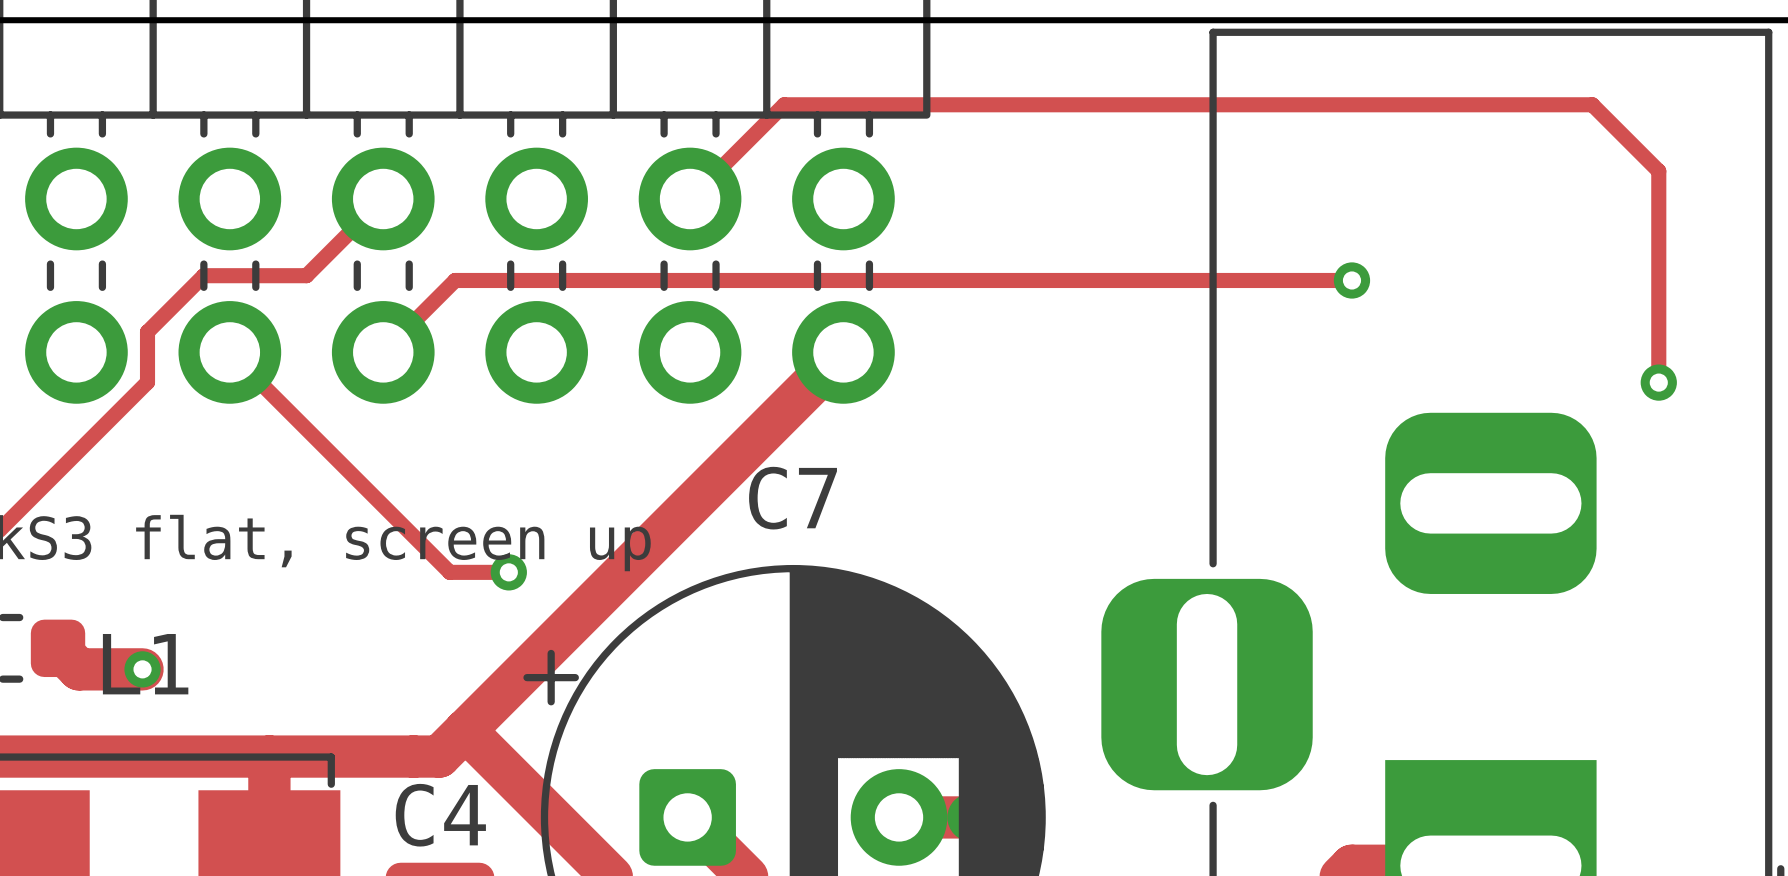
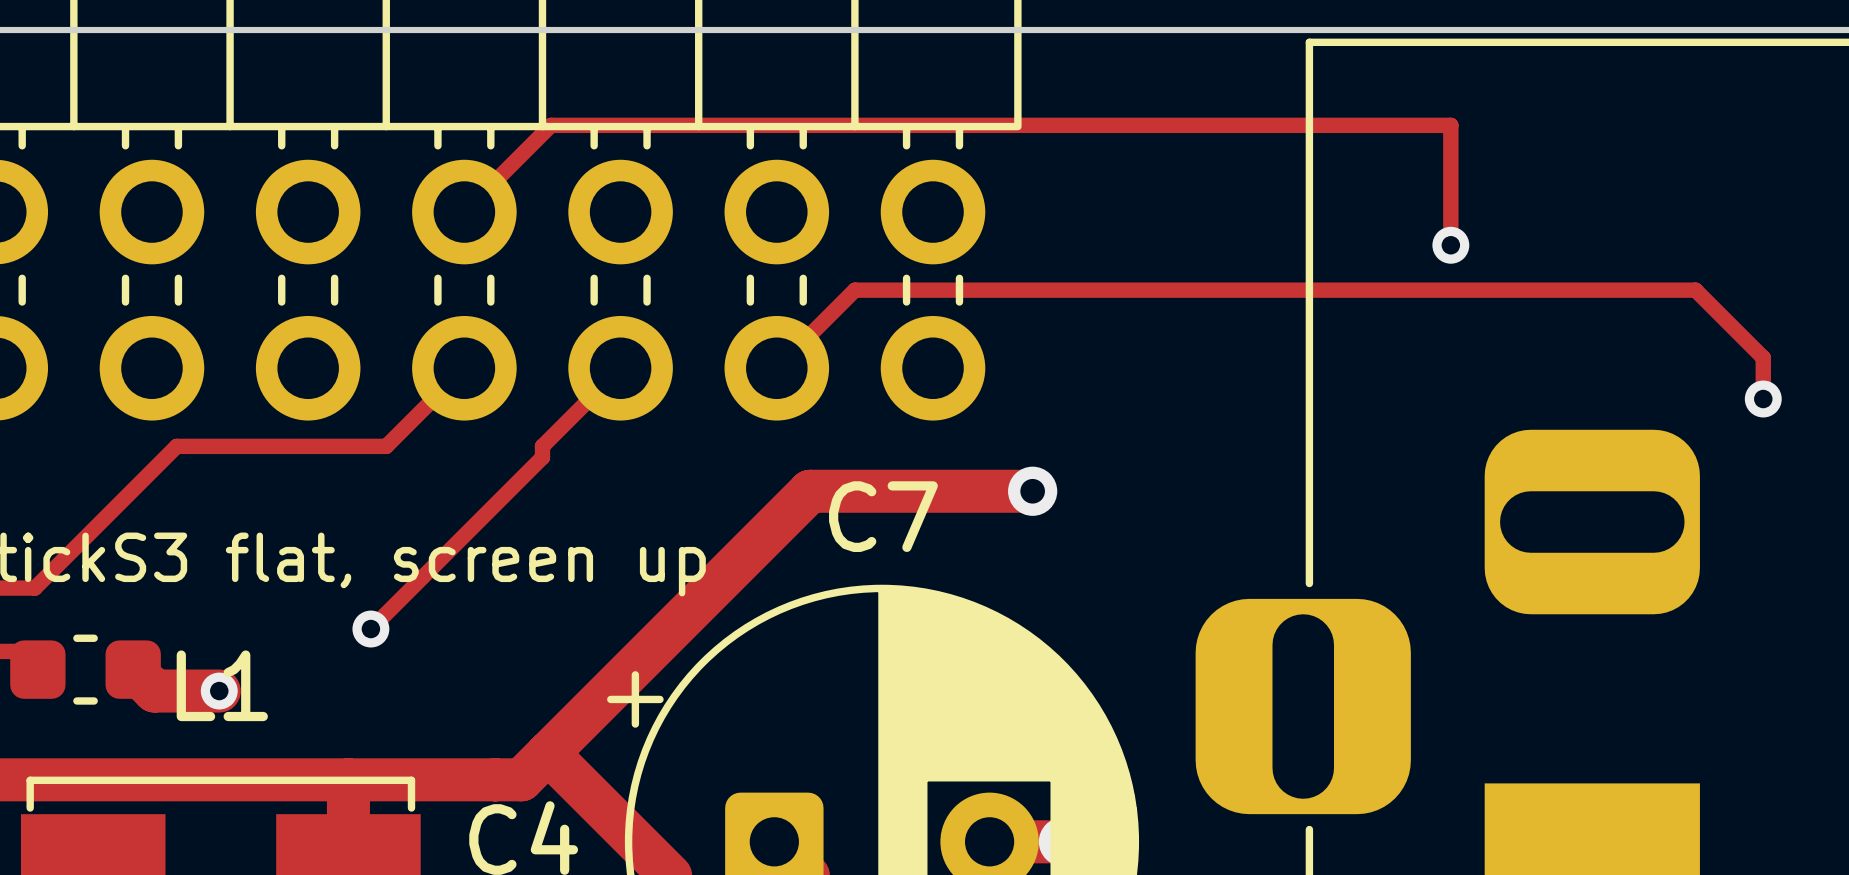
track: (383, 198) (306, 275) (203, 275) (147, 332) (147, 382) (100, 429) -> (464, 368) (386, 446) (176, 446)
track: none -> (464, 212) (551, 125) (1450, 125) (1450, 245)
track: (690, 198) (784, 104) (1592, 104) (1658, 171) (1658, 342) -> (776, 368) (854, 290) (1695, 290) (1763, 357)
track: (1351, 280) (455, 280) (383, 352) -> none
via position: (1351, 280) -> (1450, 245)
track: (229, 352) (449, 572) (508, 572) -> none
track: none -> (620, 368) (542, 446) (542, 457) (370, 629)
track: (843, 352) (722, 473) -> (1032, 491) (810, 491)
via: none -> (1032, 491)
via position: (508, 572) -> (370, 629)

